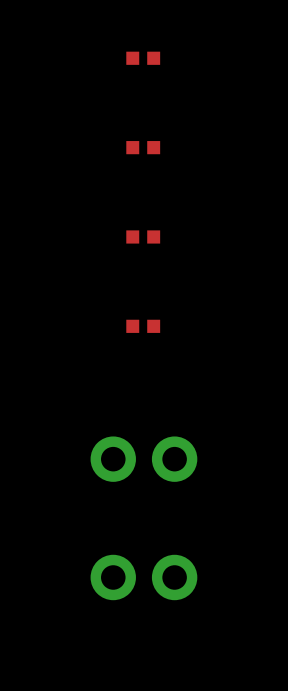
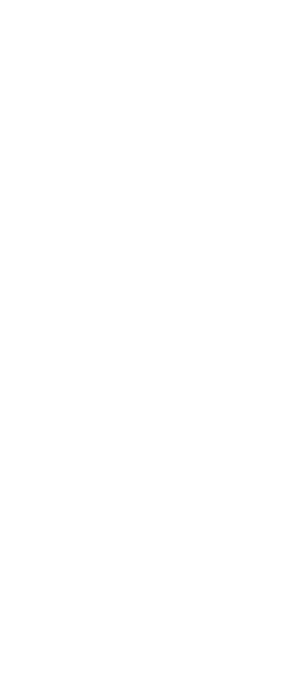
part: (143, 58) -> none
part: (143, 147) -> none
part: (143, 236) -> none
part: (143, 326) -> none
part: (143, 459) -> none
part: (143, 577) -> none

